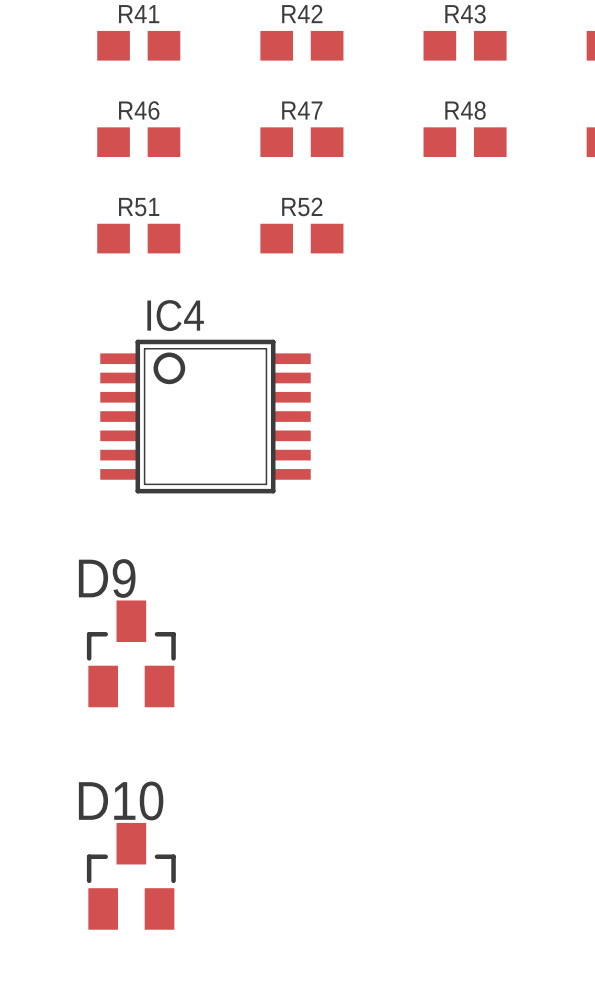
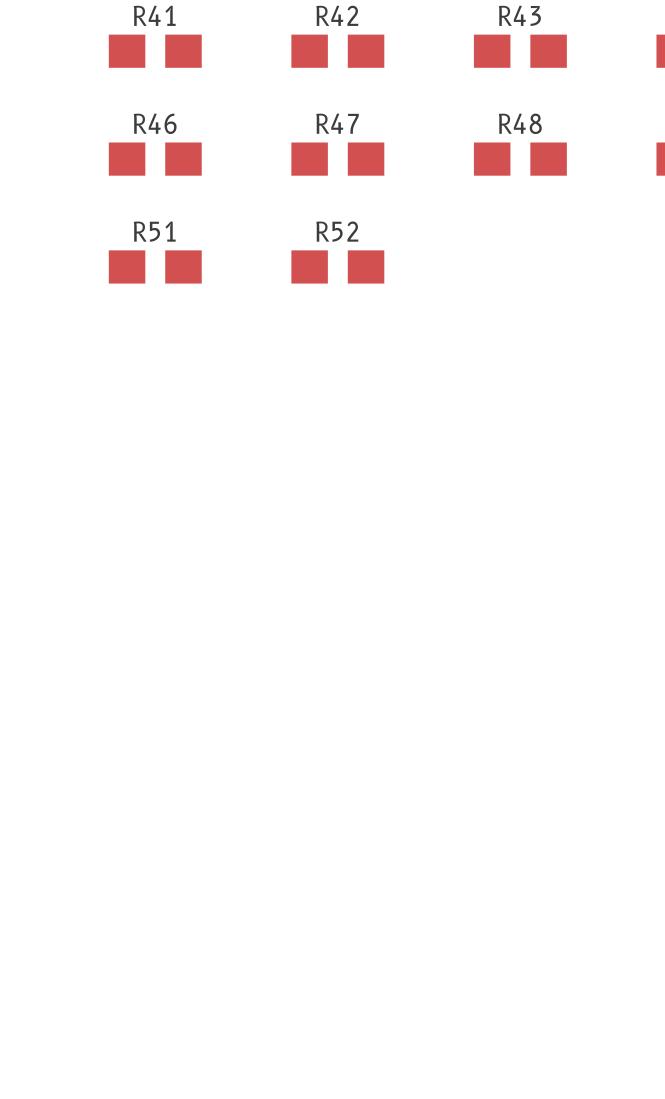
IC4: (205, 416) -> none
D9: (131, 653) -> none
D10: (131, 876) -> none

